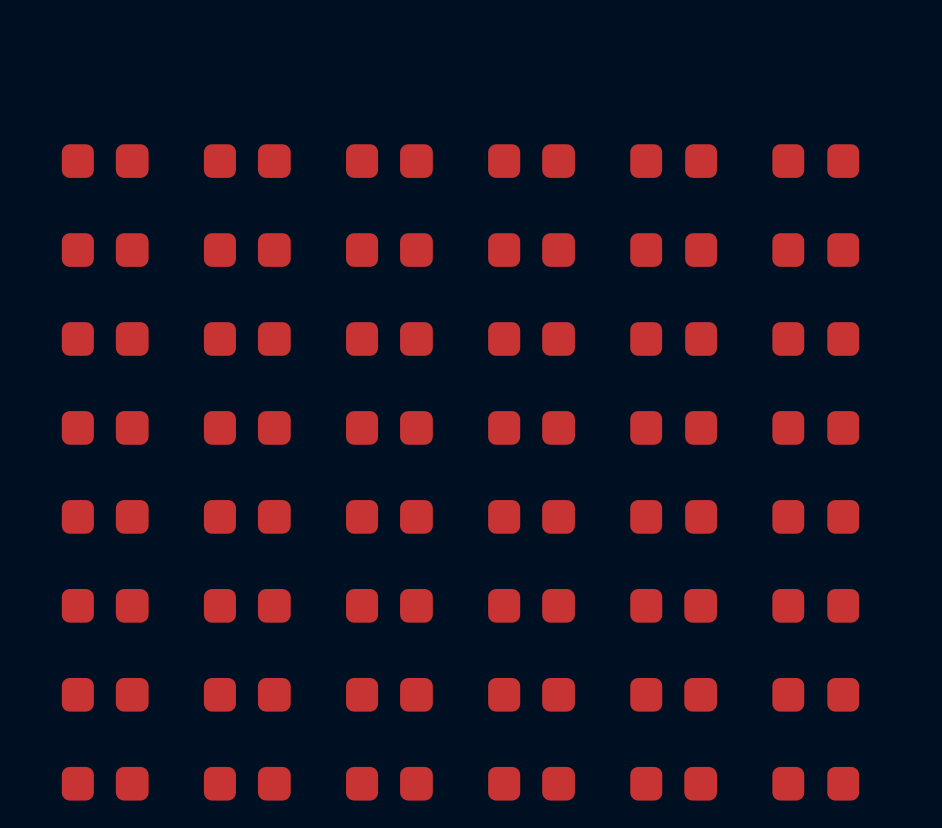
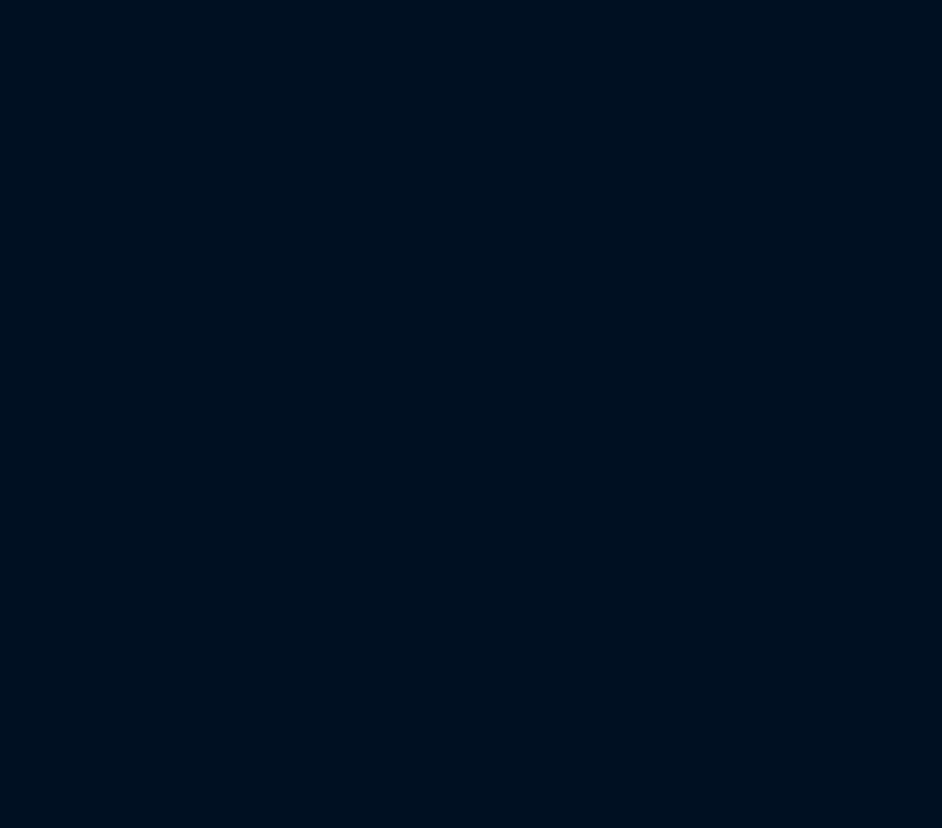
part: (105, 161) -> none
part: (247, 161) -> none
part: (389, 161) -> none
part: (531, 161) -> none
part: (673, 161) -> none
part: (815, 161) -> none
part: (105, 250) -> none
part: (247, 250) -> none
part: (389, 250) -> none
part: (531, 250) -> none
part: (673, 250) -> none
part: (815, 250) -> none
part: (105, 338) -> none
part: (247, 338) -> none
part: (389, 338) -> none
part: (531, 338) -> none
part: (673, 338) -> none
part: (815, 338) -> none
part: (105, 427) -> none
part: (247, 427) -> none
part: (389, 427) -> none
part: (531, 427) -> none
part: (673, 427) -> none
part: (815, 427) -> none
part: (105, 516) -> none
part: (247, 516) -> none
part: (389, 516) -> none
part: (531, 516) -> none
part: (673, 516) -> none
part: (815, 516) -> none
part: (105, 605) -> none
part: (247, 605) -> none
part: (389, 605) -> none
part: (531, 605) -> none
part: (673, 605) -> none
part: (815, 605) -> none
part: (105, 694) -> none
part: (247, 694) -> none
part: (389, 694) -> none
part: (531, 694) -> none
part: (673, 694) -> none
part: (815, 694) -> none
part: (105, 783) -> none
part: (247, 783) -> none
part: (389, 783) -> none
part: (531, 783) -> none
part: (673, 783) -> none
part: (815, 783) -> none

